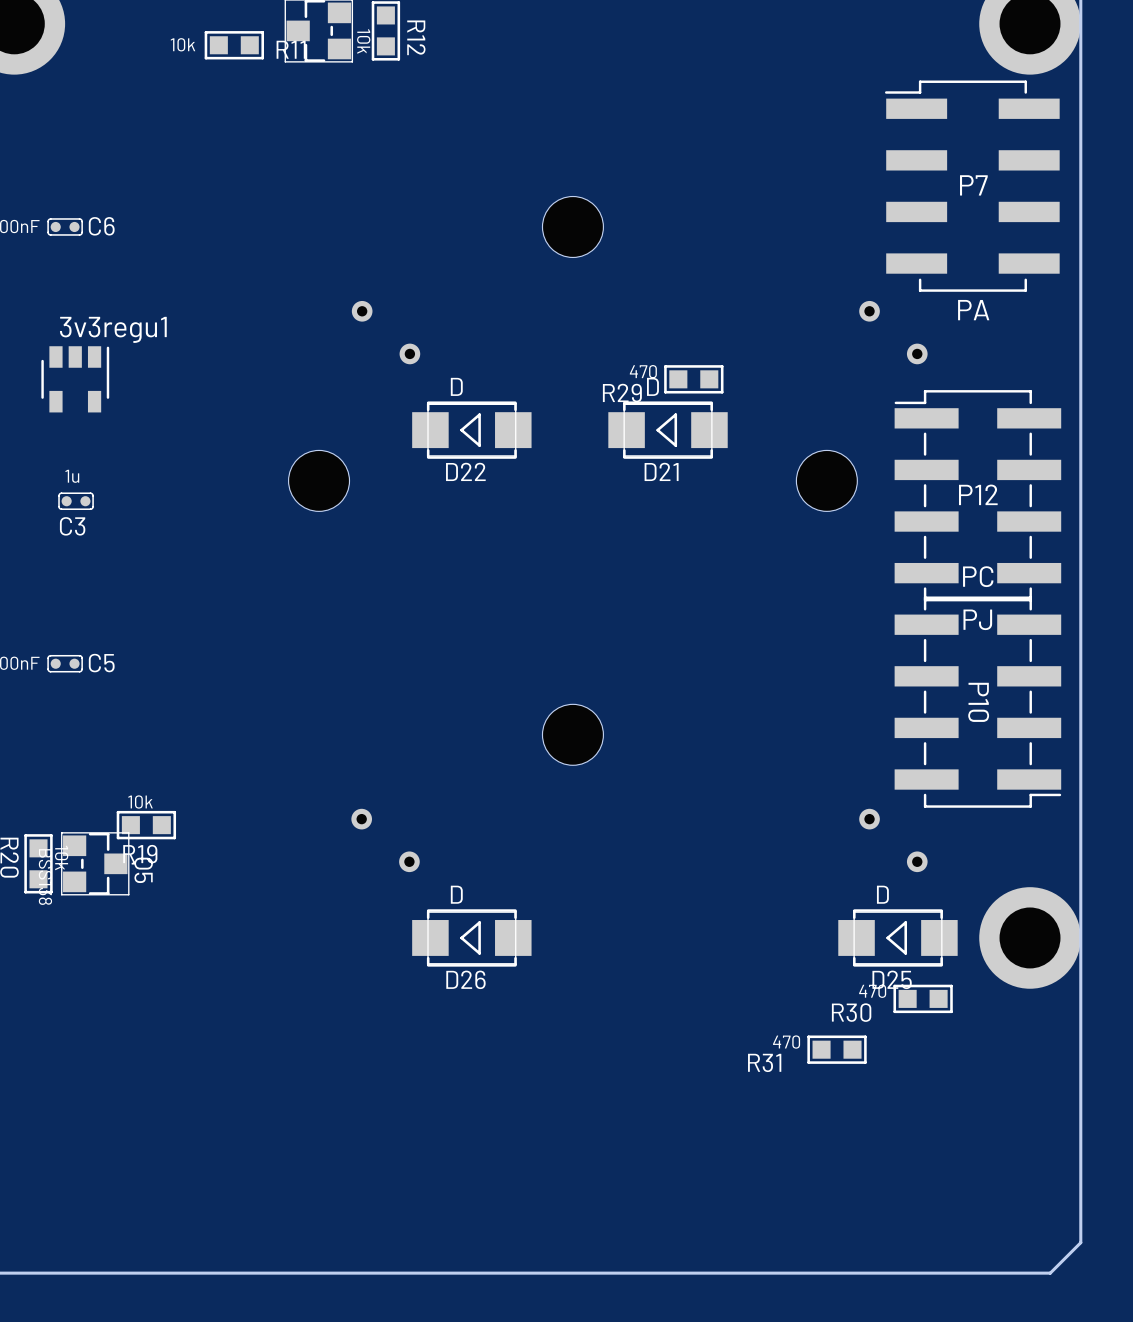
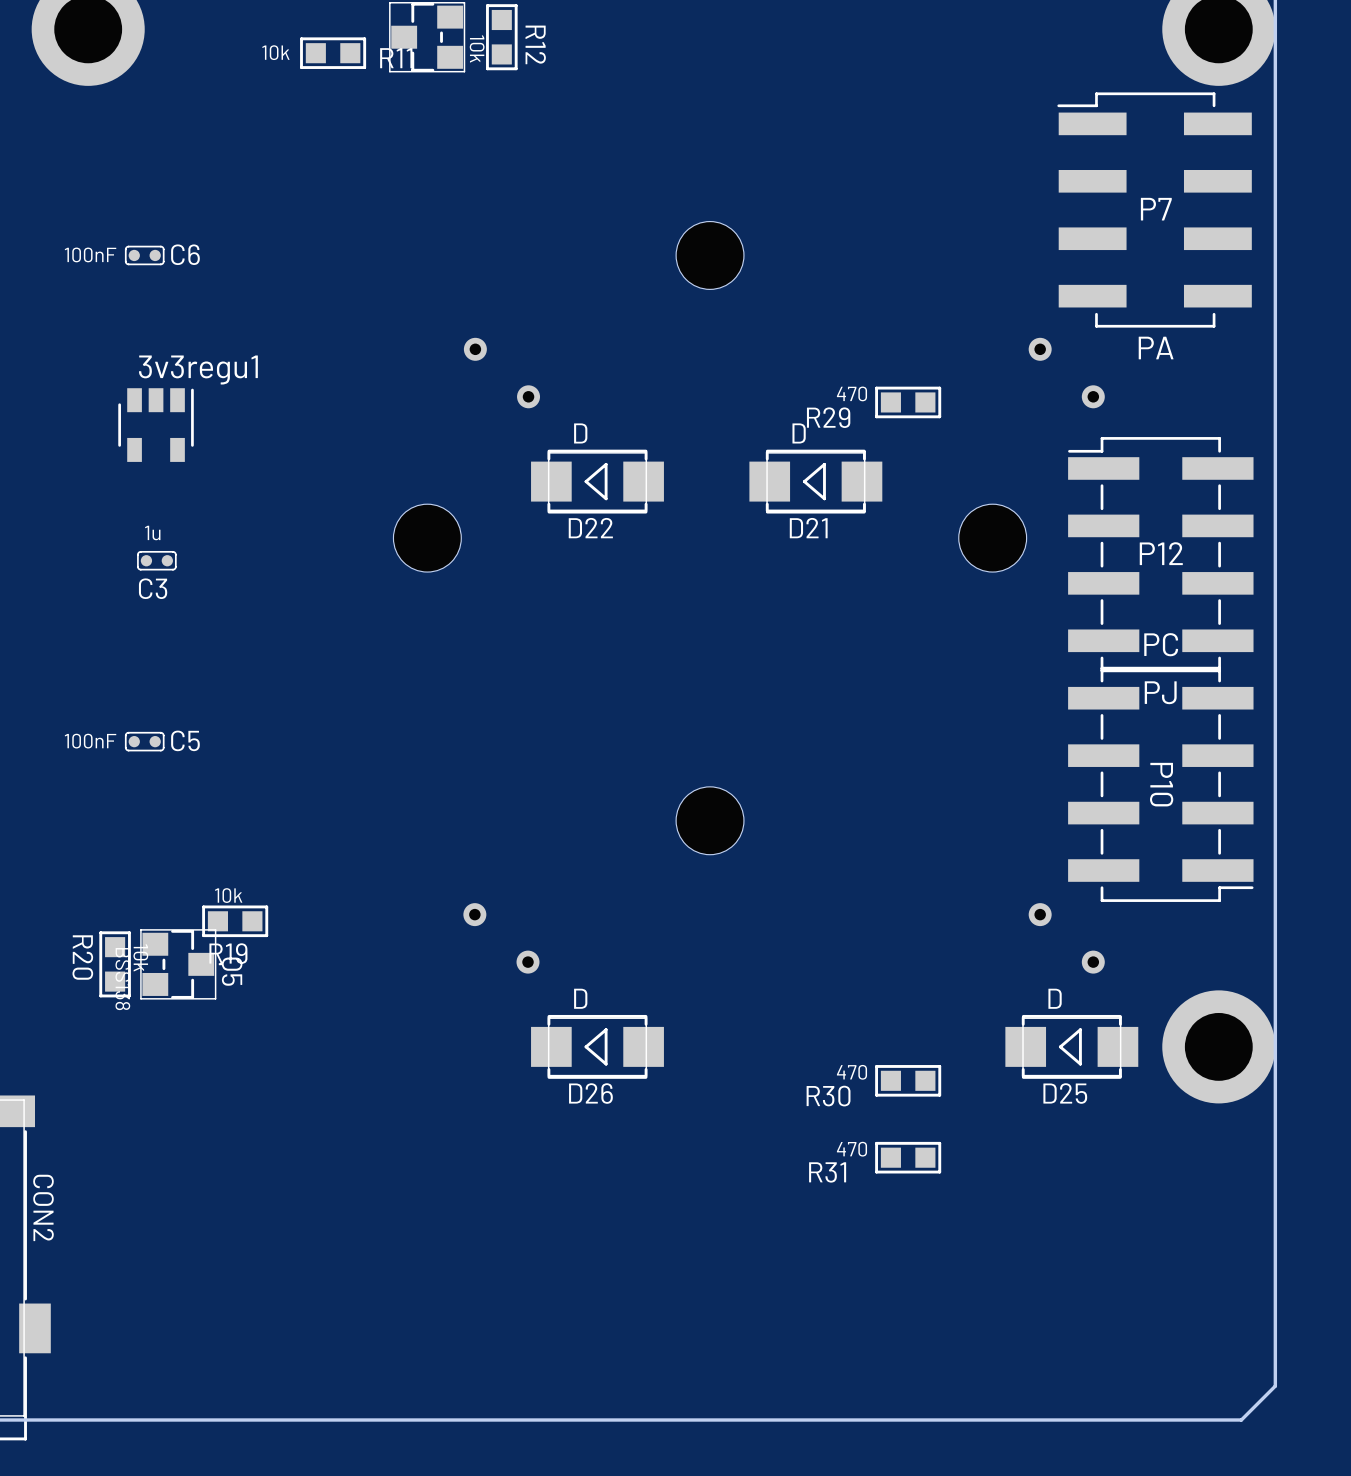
R29 position: (693, 379) -> (908, 402)
R30 position: (923, 998) -> (908, 1080)
R31 position: (837, 1049) -> (908, 1157)

